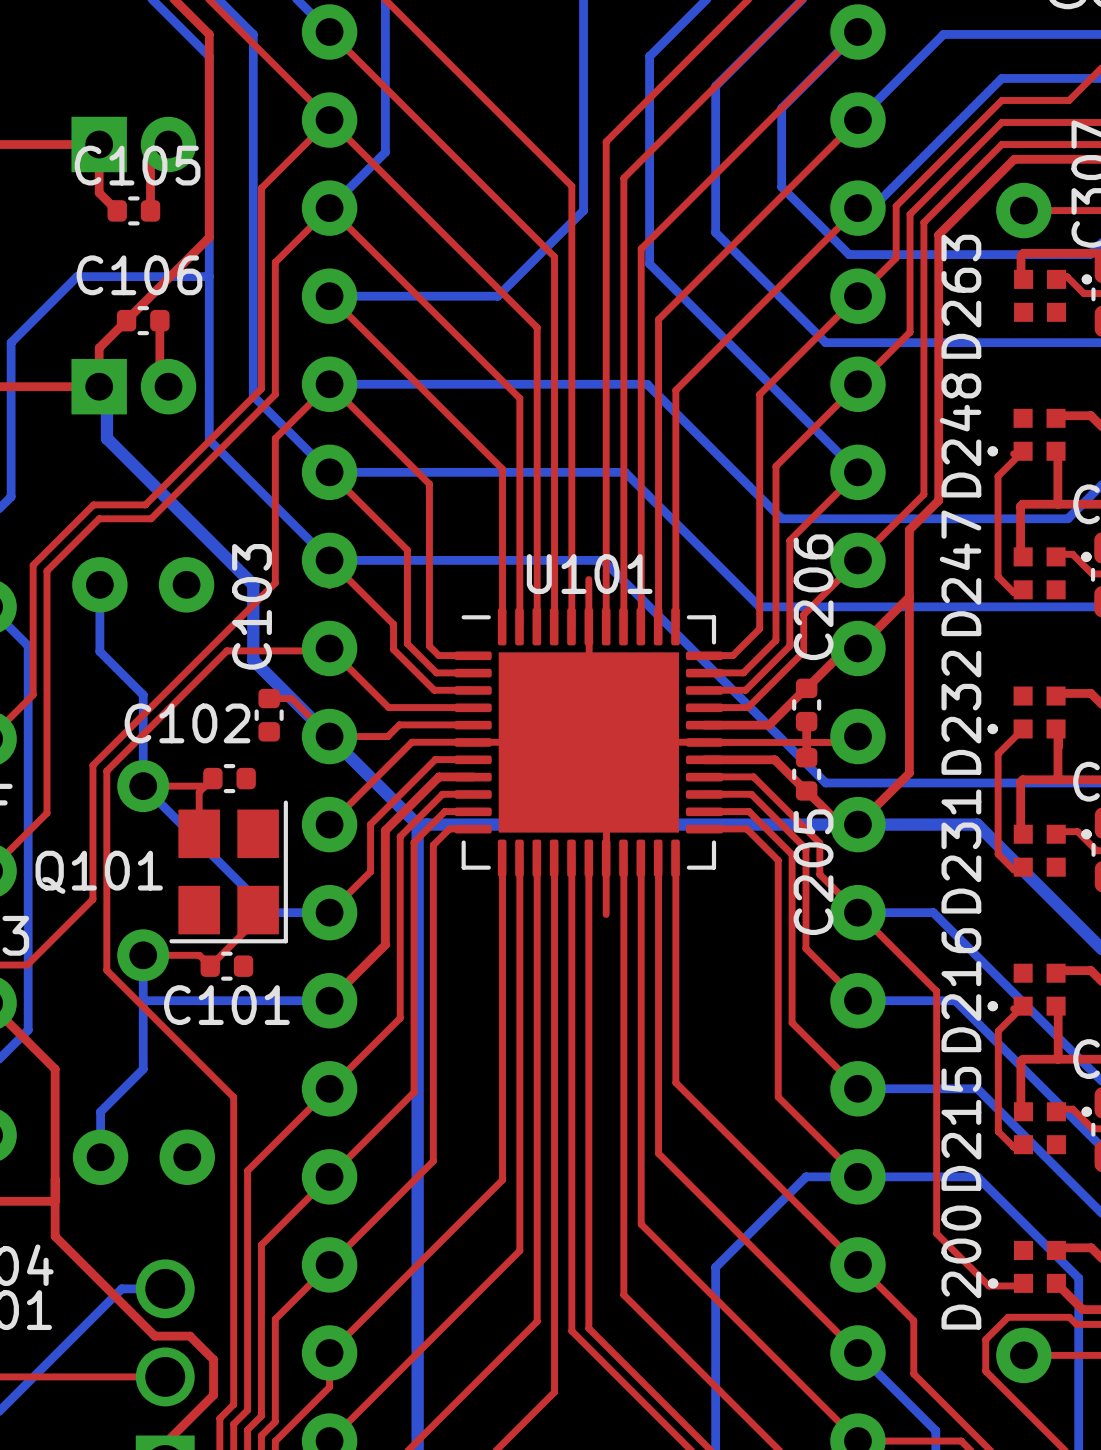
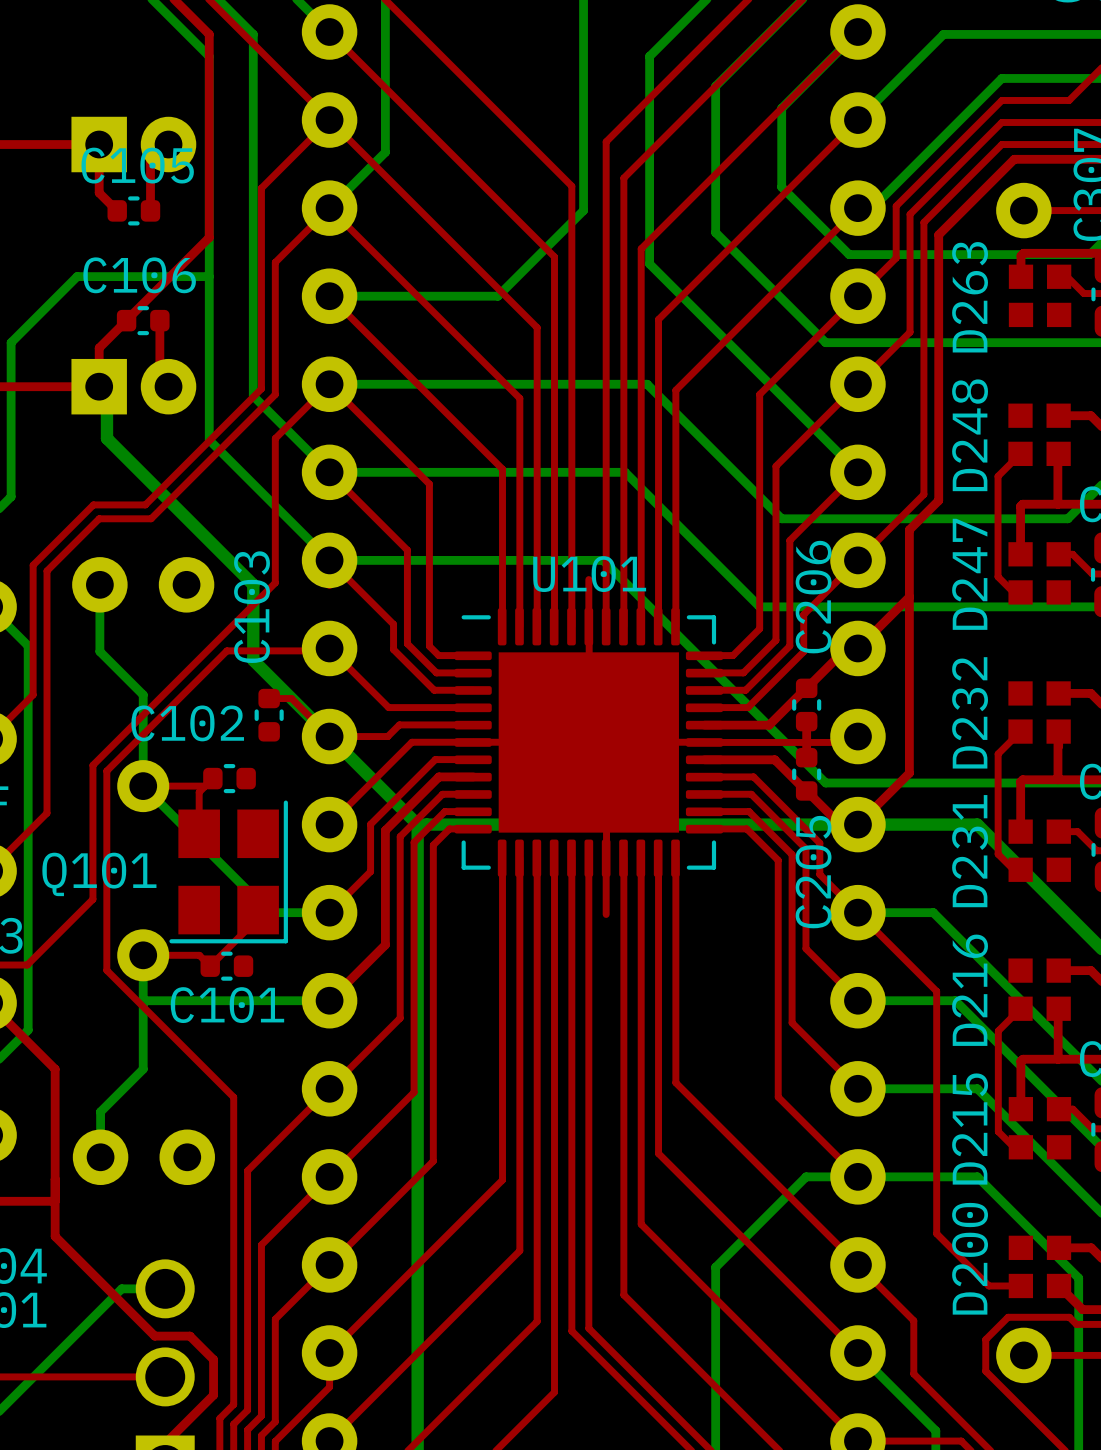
D263 footprint: [1014, 269, 1093, 322] -> [1008, 264, 1072, 328]
D248 footprint: [987, 408, 1066, 461] -> [1008, 403, 1071, 466]
D247 footprint: [1013, 547, 1092, 600] -> [1008, 542, 1071, 605]
D232 footprint: [987, 686, 1066, 739] -> [1008, 681, 1071, 744]
D231 footprint: [1013, 824, 1092, 877] -> [1008, 819, 1071, 882]
D216 footprint: [987, 963, 1066, 1016] -> [1008, 958, 1071, 1021]
D215 footprint: [1013, 1102, 1092, 1155] -> [1008, 1097, 1072, 1160]
D200 footprint: [987, 1240, 1066, 1293] -> [1008, 1235, 1072, 1299]

